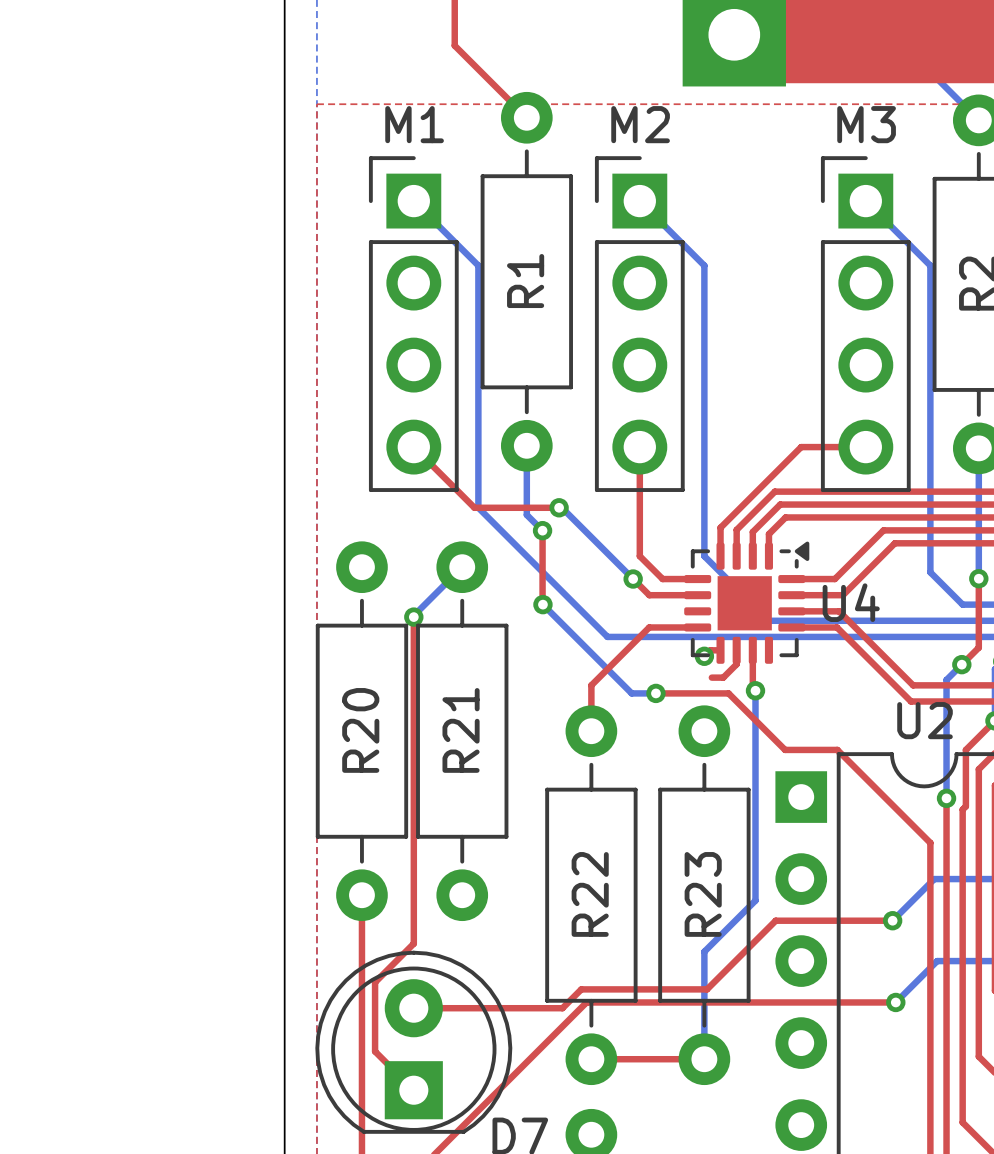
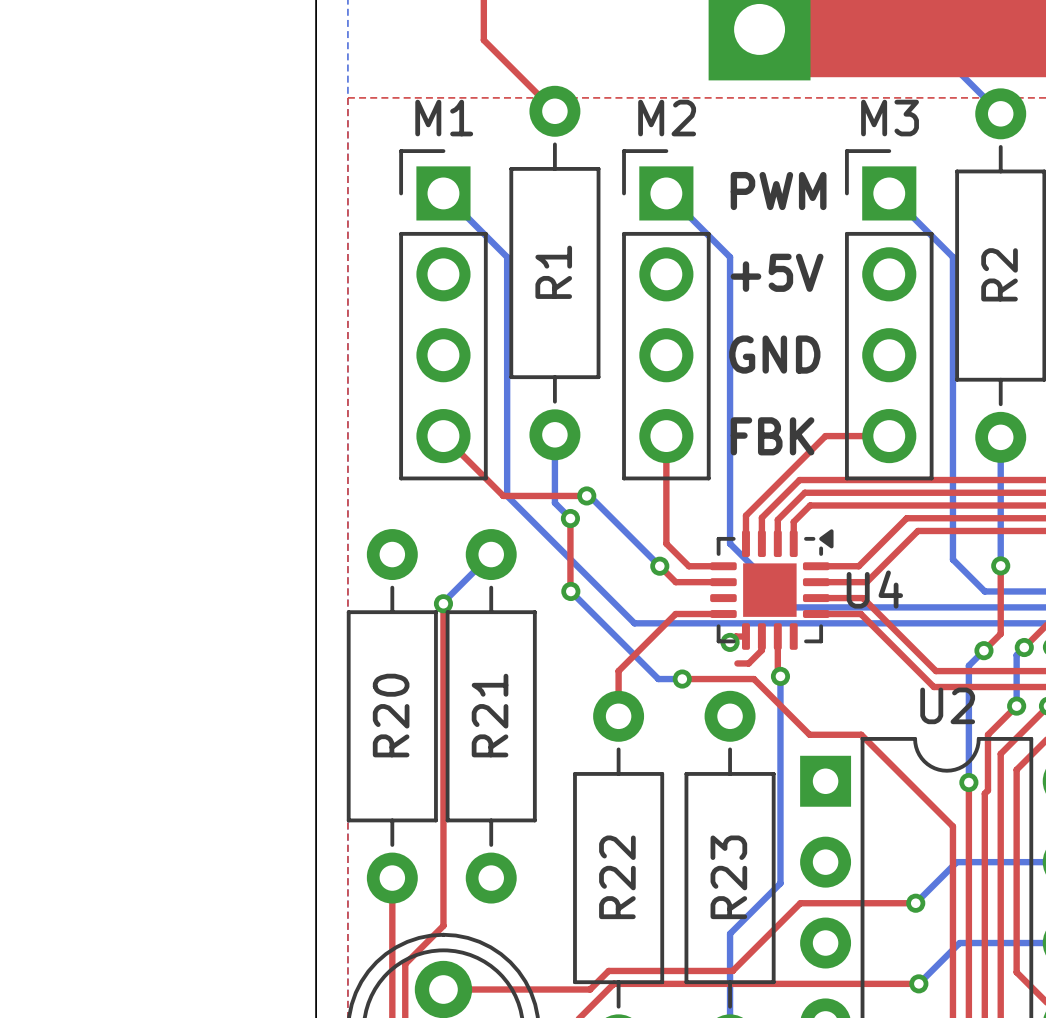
text: none -> PWM (778, 191)
text: none -> +5V (777, 272)
text: none -> GND (774, 354)
text: none -> FBK (772, 436)

